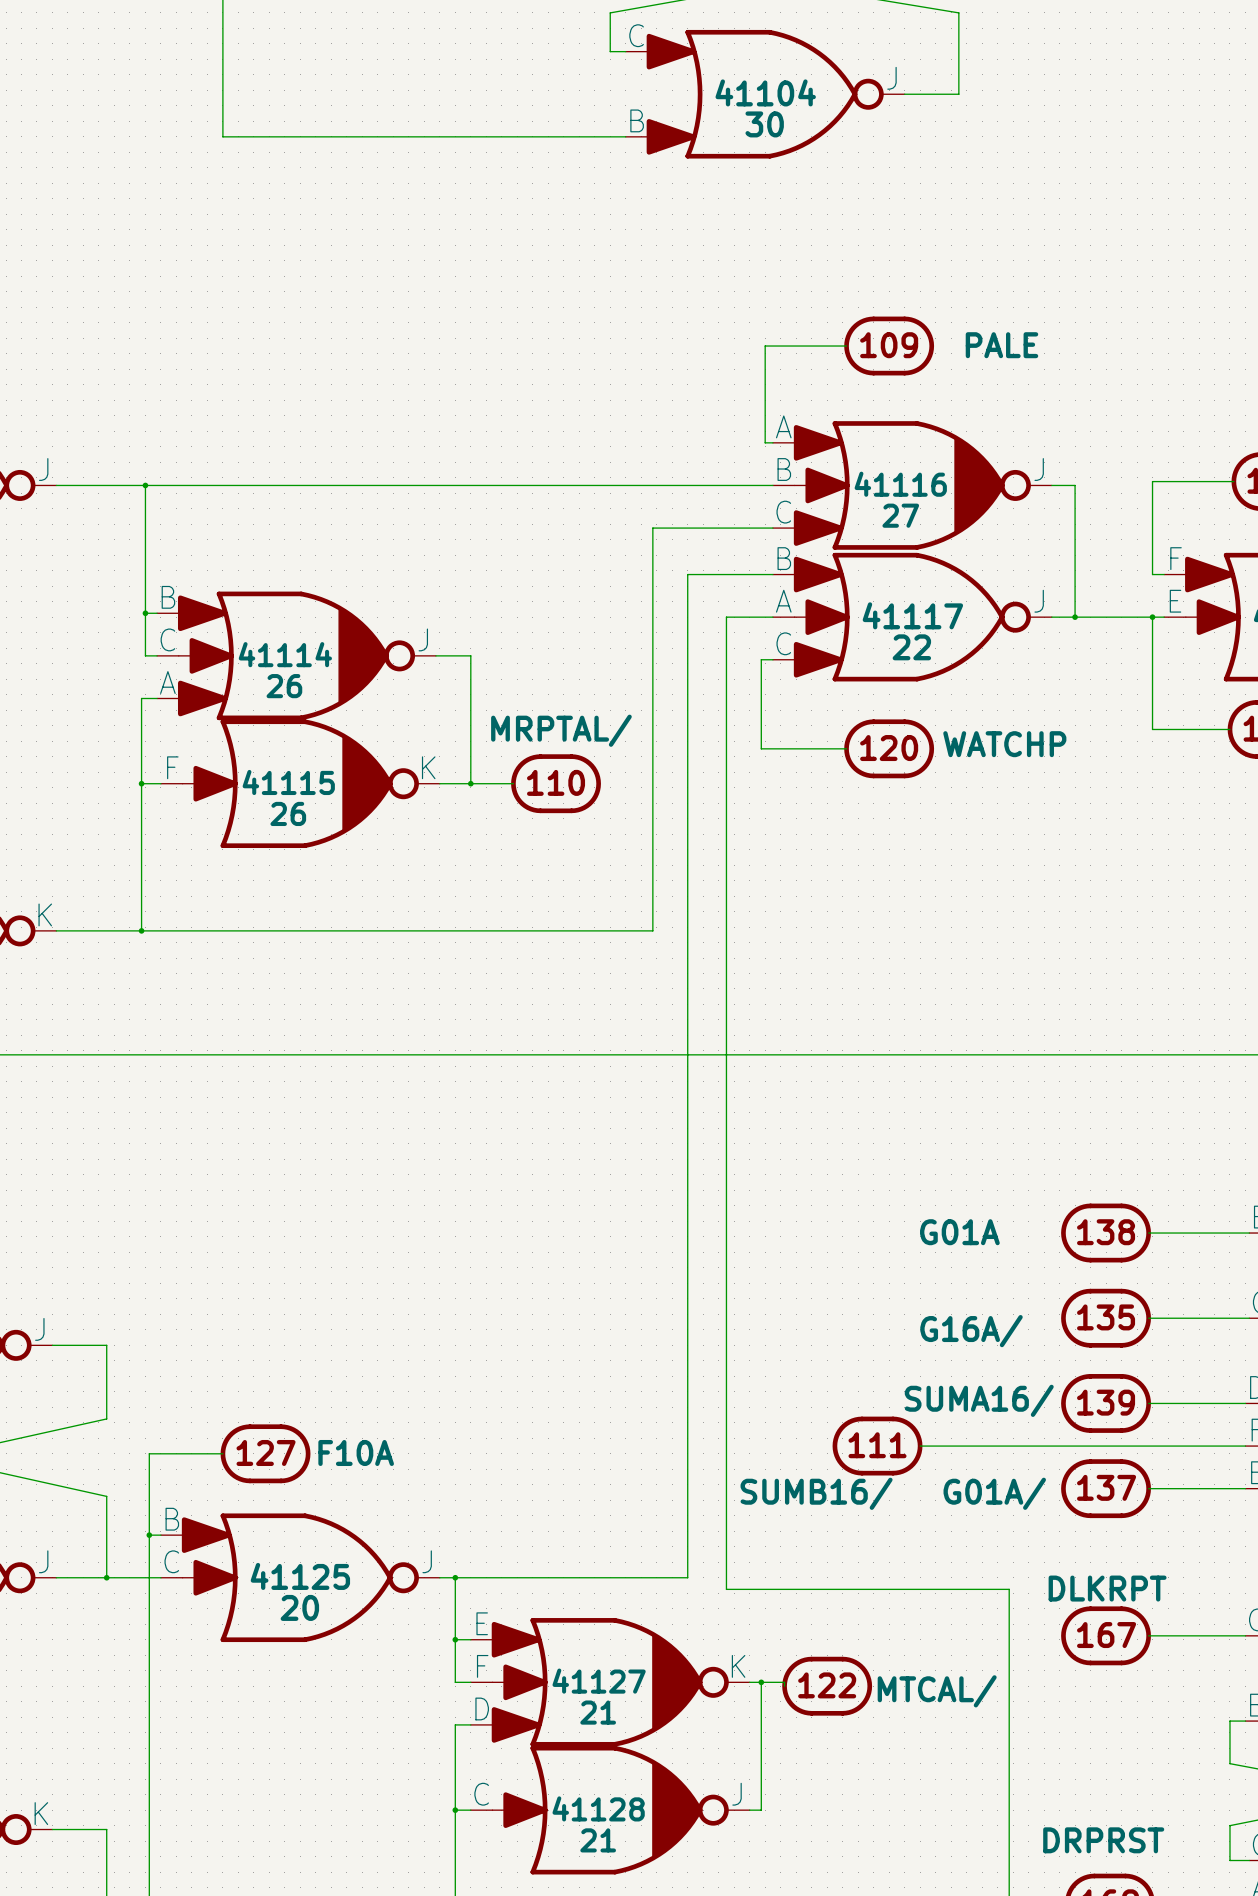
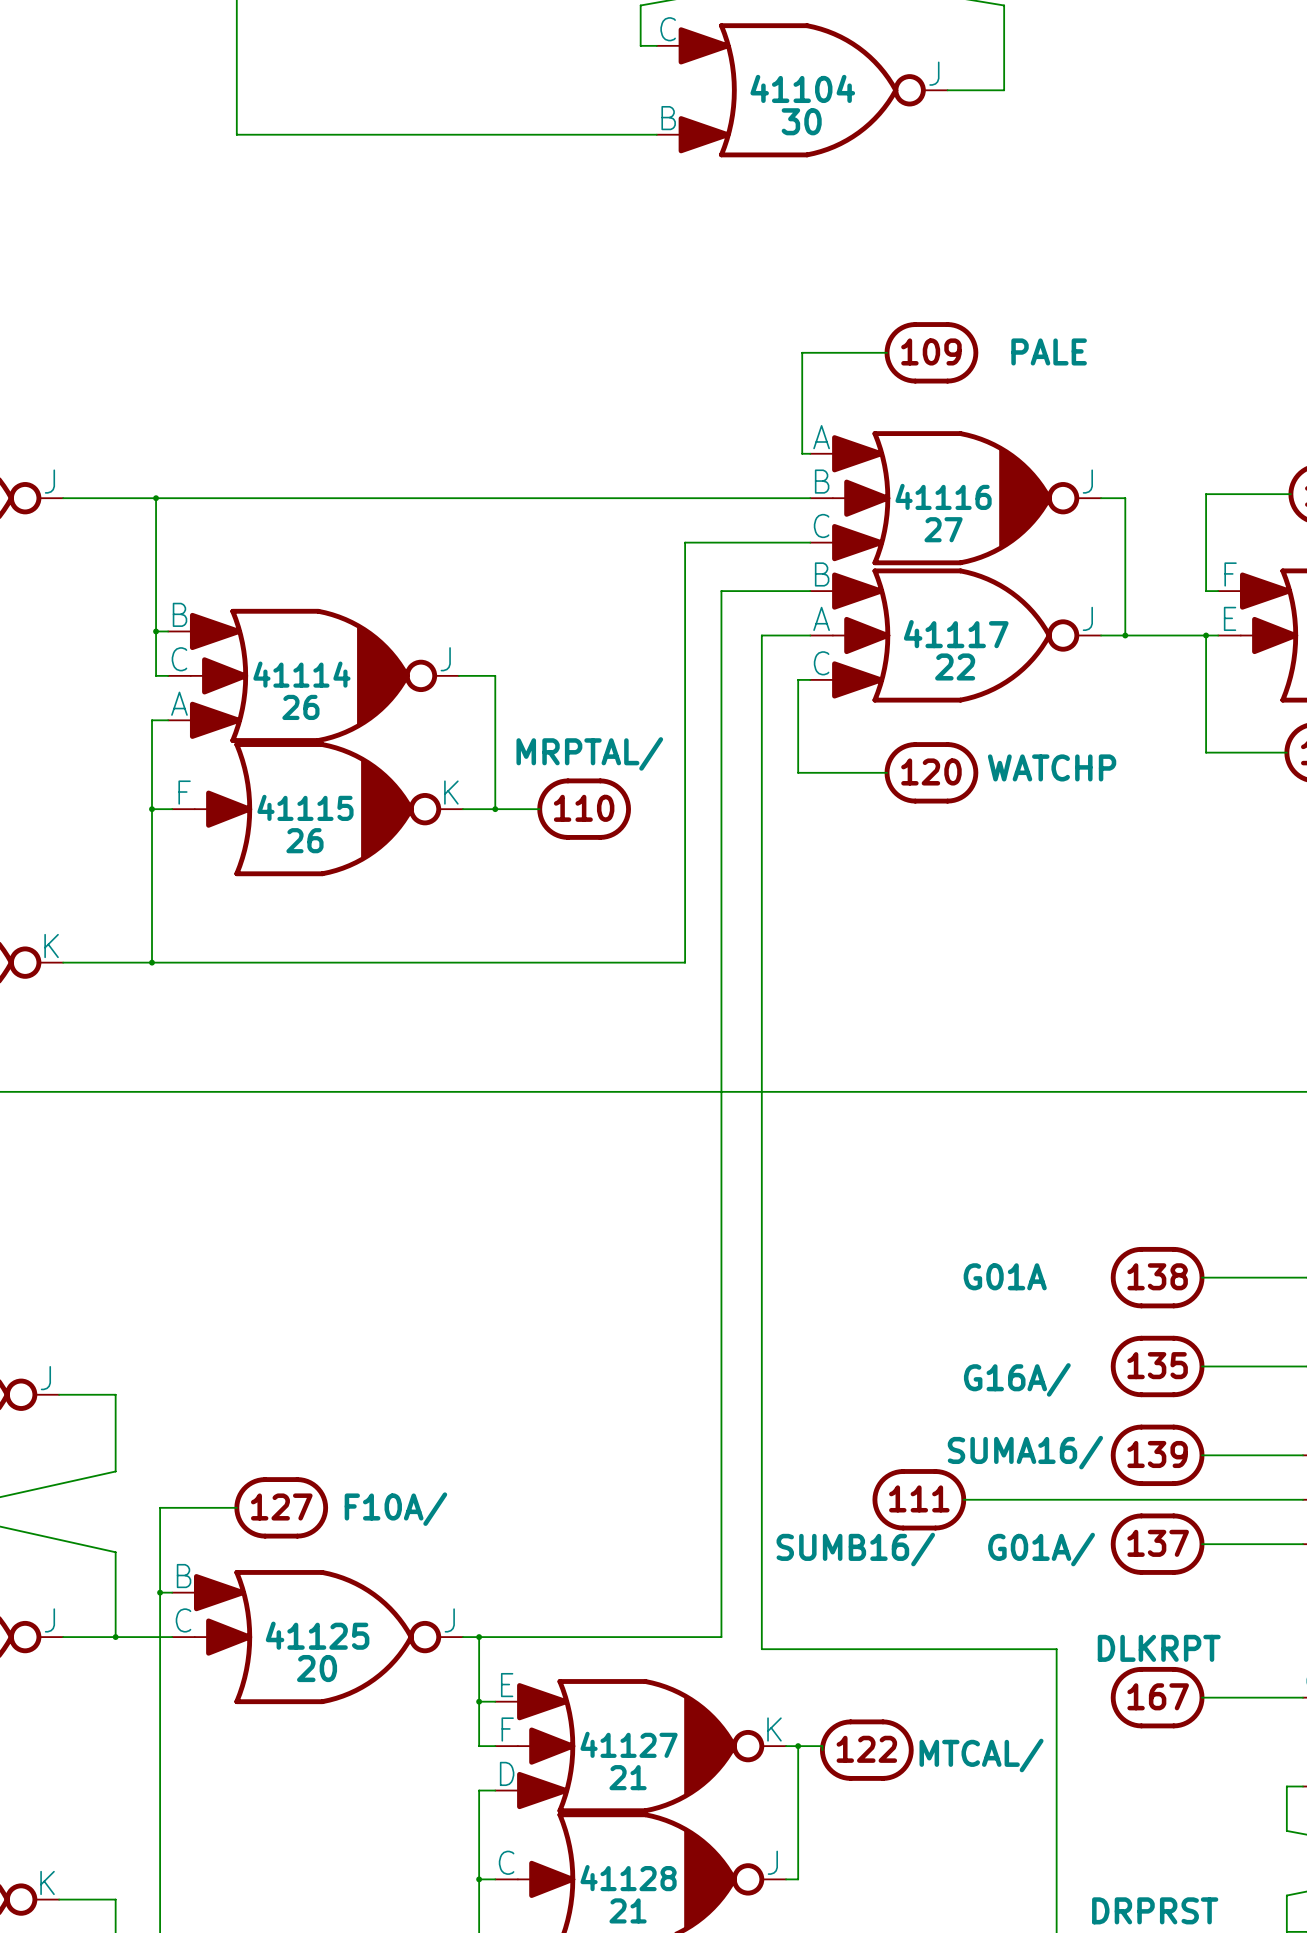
part text: F10A (356, 1452) -> F10A/ (395, 1509)

